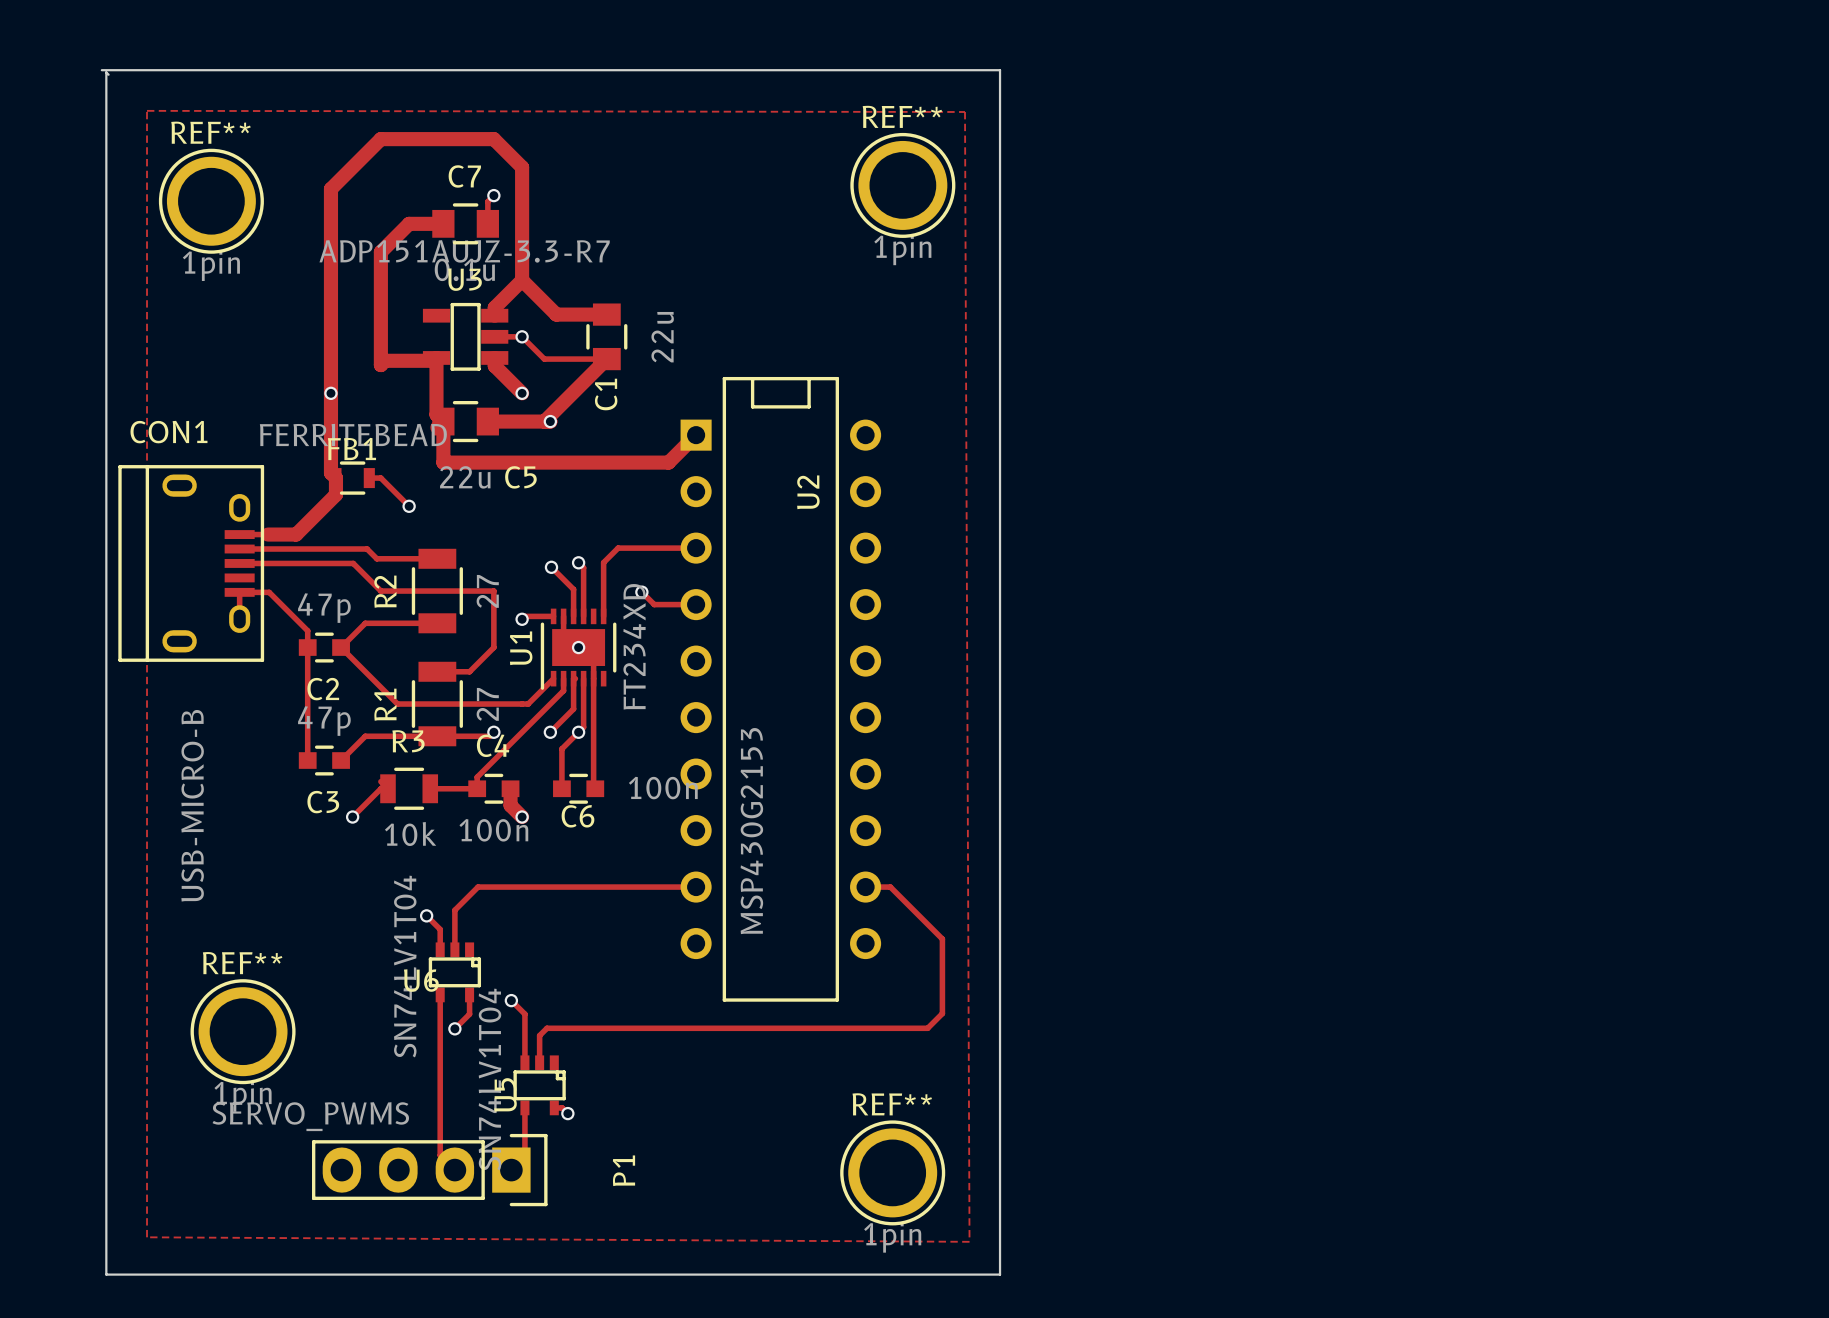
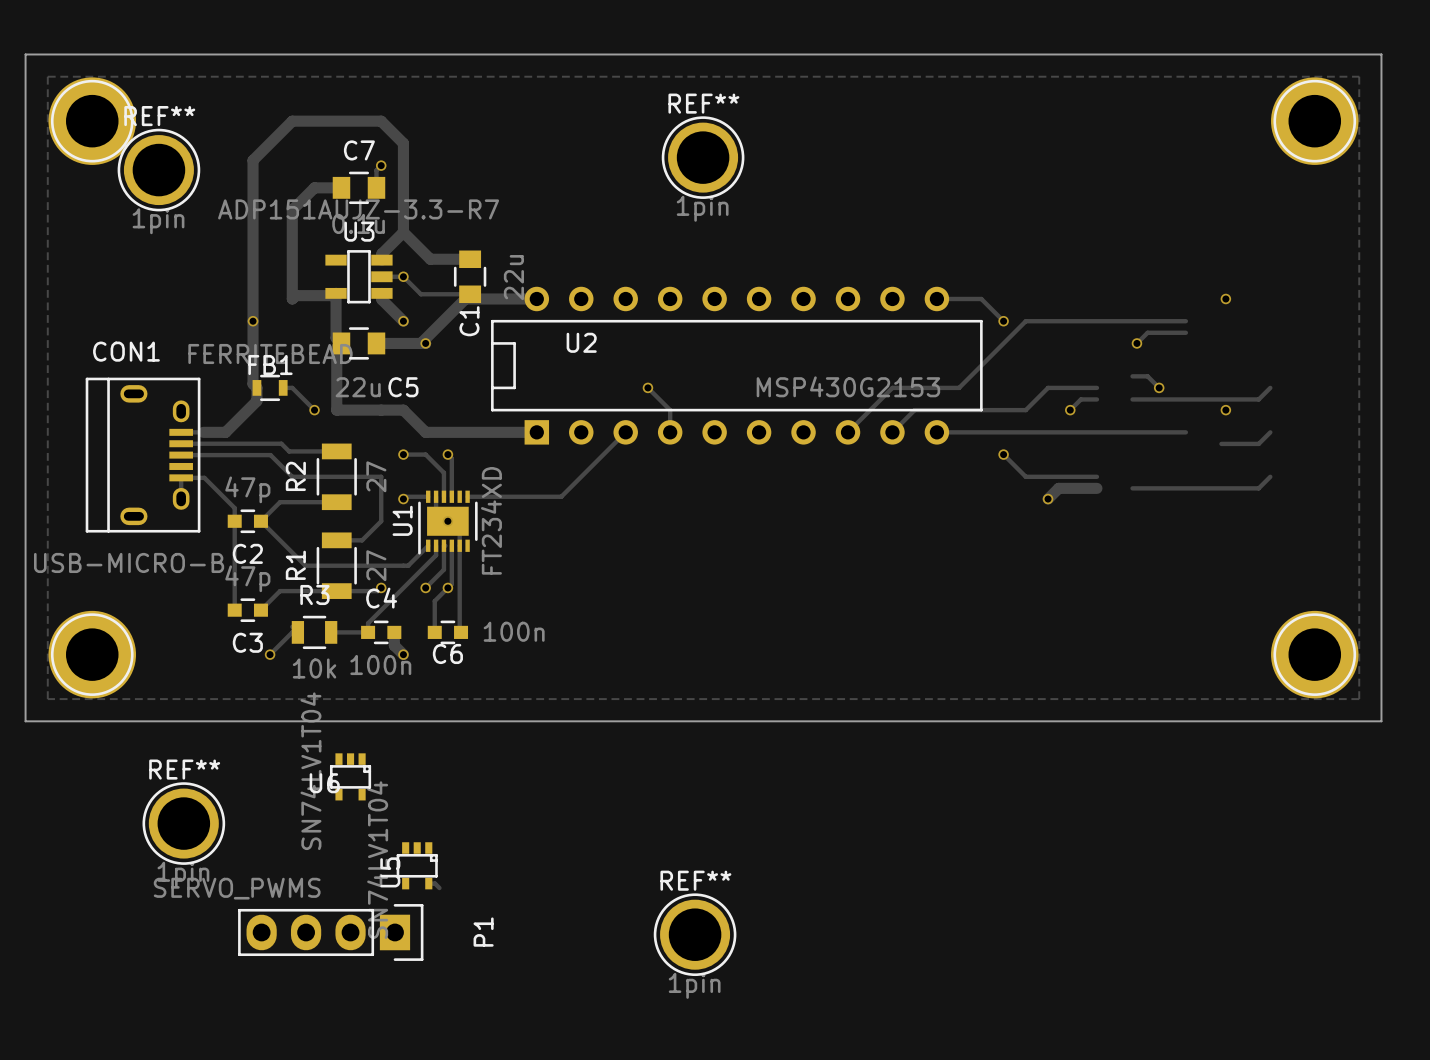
board edge: none -> (25, 54) (1381, 54) (1381, 721) (25, 721) (25, 54)
board edge: (101, 70) (1000, 70) (1000, 1274) (106, 1274) (106, 72) (108, 74) -> none
zone outline: none -> (47, 76) (47, 699) (1359, 699) (1359, 76) (47, 76)
zone outline: (147, 110) (965, 112) (969, 1241) (147, 1237) (147, 110) -> none
part: none -> (92, 121)
part: none -> (1314, 121)
track: none -> (465, 298) (536, 298)
track: none -> (936, 298) (981, 298) (1003, 321)
via: none -> (1225, 298)
via: none -> (1003, 321)
track: none -> (1185, 321) (1025, 321) (959, 387) (892, 387) (848, 432)
track: none -> (1185, 332) (1147, 332) (1136, 343)
track: (443, 421) (443, 462) (668, 462) (696, 435) -> none
via: none -> (1136, 343)
track: none -> (336, 348) (336, 410) (403, 410) (425, 432) (536, 432)
track: none -> (1132, 376) (1147, 376) (1159, 387)
track: none -> (647, 387) (670, 410) (670, 432)
via: none -> (647, 387)
track: none -> (1096, 387) (1048, 387) (1025, 410) (914, 410) (892, 432)
via: none -> (1159, 387)
track: none -> (1270, 387) (1258, 399) (1132, 399)
track: none -> (1096, 399) (1080, 399) (1070, 410)
via: none -> (1070, 410)
via: none -> (1225, 410)
track: none -> (936, 432) (1185, 432)
track: none -> (1270, 432) (1258, 443) (1221, 443)
track: (696, 548) (618, 548) (603, 562) (603, 616) -> (625, 432) (561, 496) (467, 496)
track: none -> (1003, 454) (1025, 476) (1096, 476)
via: none -> (1003, 454)
track: (551, 567) (573, 589) -> (403, 454) (425, 454) (443, 472) (443, 475)
via position: (551, 567) -> (403, 454)
track: none -> (1270, 476) (1258, 488) (1132, 488)
track: (641, 592) (654, 604) (696, 604) -> none
via: (641, 592) -> none
track: none -> (1096, 488) (1058, 488) (1048, 499)
via: none -> (1048, 499)
U2 rotation: 0° (780, 689) -> 90° counterclockwise (736, 365)
CON1 value rotation: 0° (192, 805) -> 90° clockwise (129, 562)
part: none -> (92, 654)
part: none -> (1314, 654)
track: (696, 887) (478, 887) (454, 910) (454, 949) -> none
track: (865, 887) (890, 887) (942, 939) (942, 1013) (927, 1028) (546, 1028) (539, 1035) (539, 1062) -> none
track: (426, 915) (440, 929) (440, 949) -> none
via: (426, 915) -> none
track: (440, 994) (440, 1155) (454, 1170) -> none
track: (469, 994) (469, 1014) (454, 1028) -> none
track: (511, 1000) (524, 1014) (524, 1062) -> none
via: (511, 1000) -> none
via: (454, 1028) -> none
track: (524, 1107) (524, 1156) (511, 1170) -> none
via: (567, 1113) -> none

